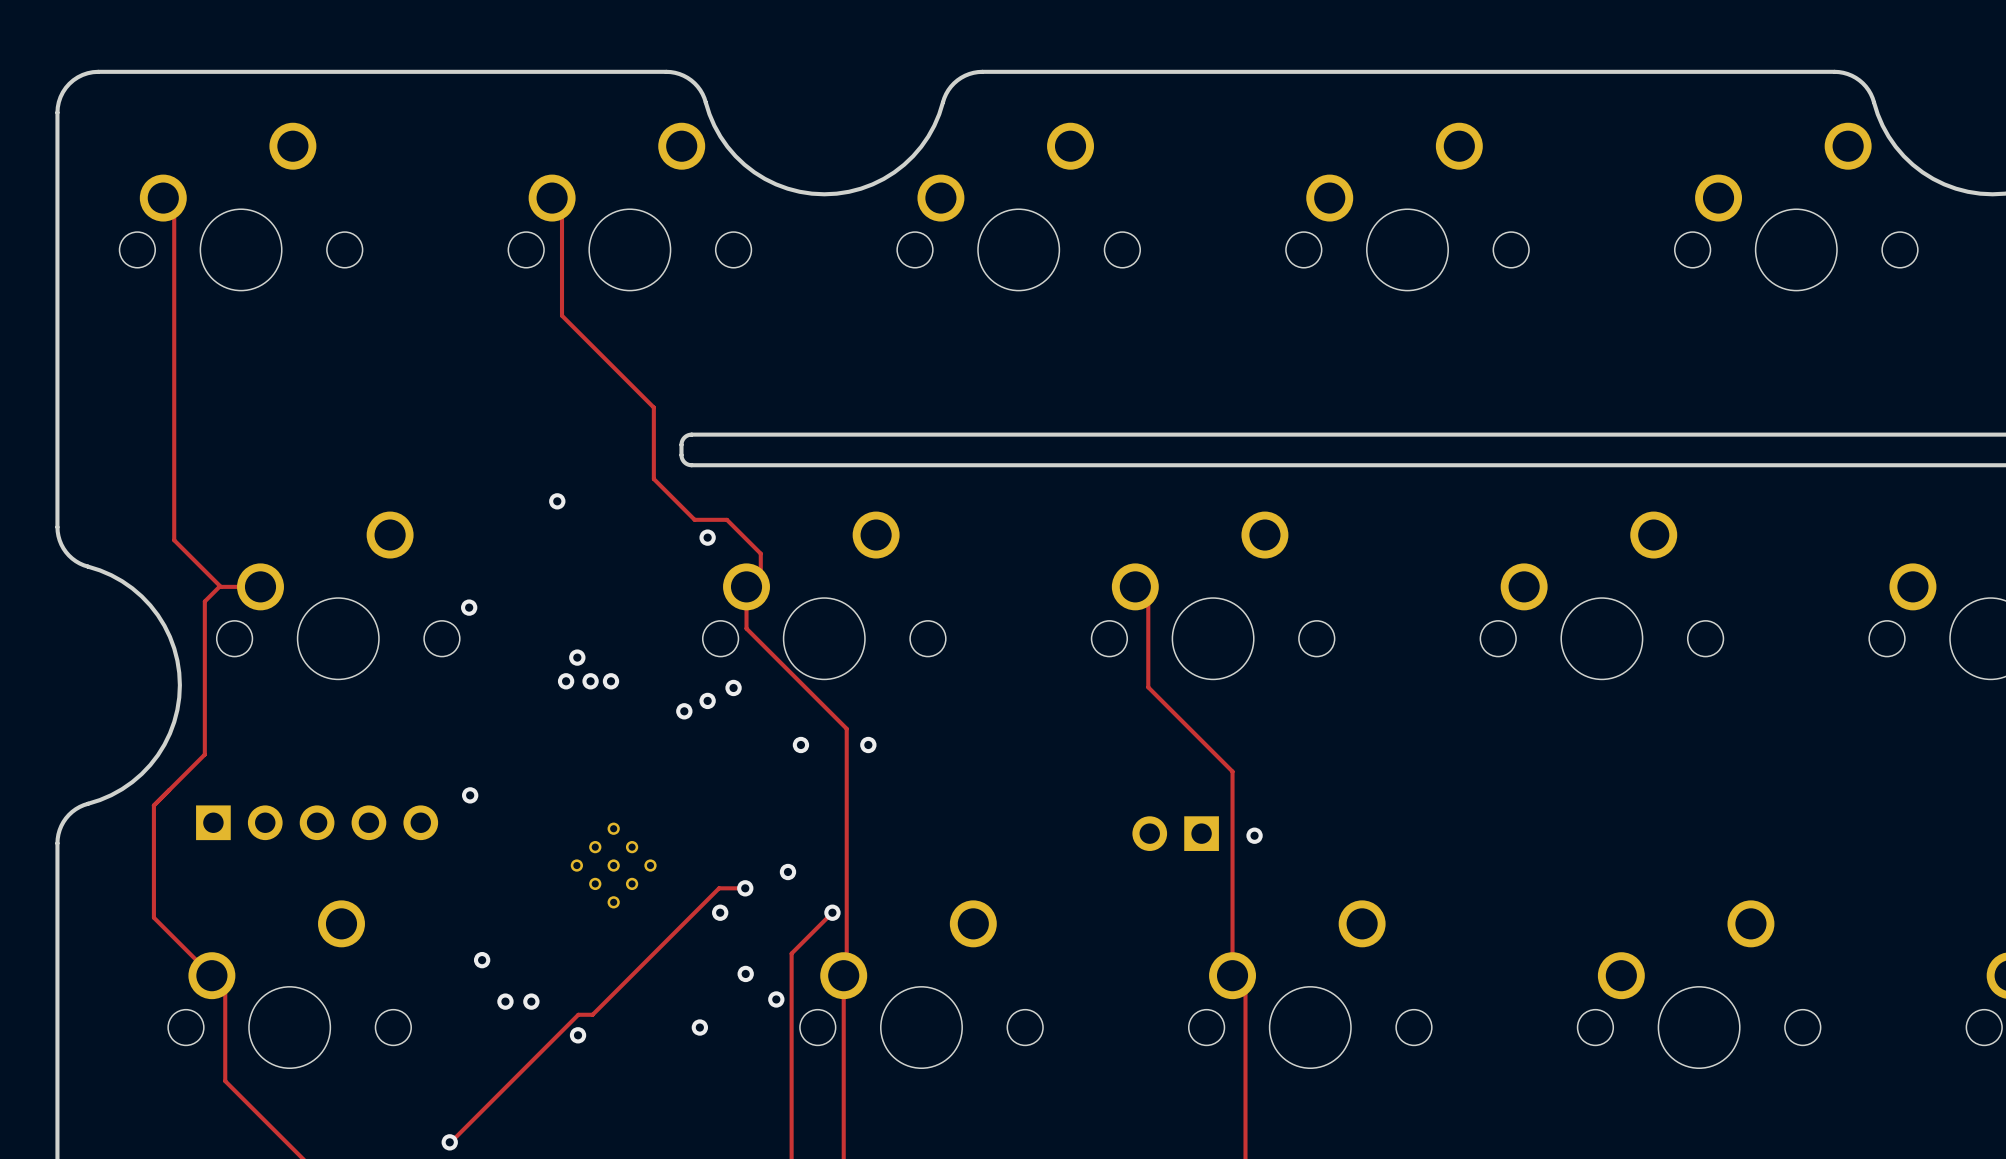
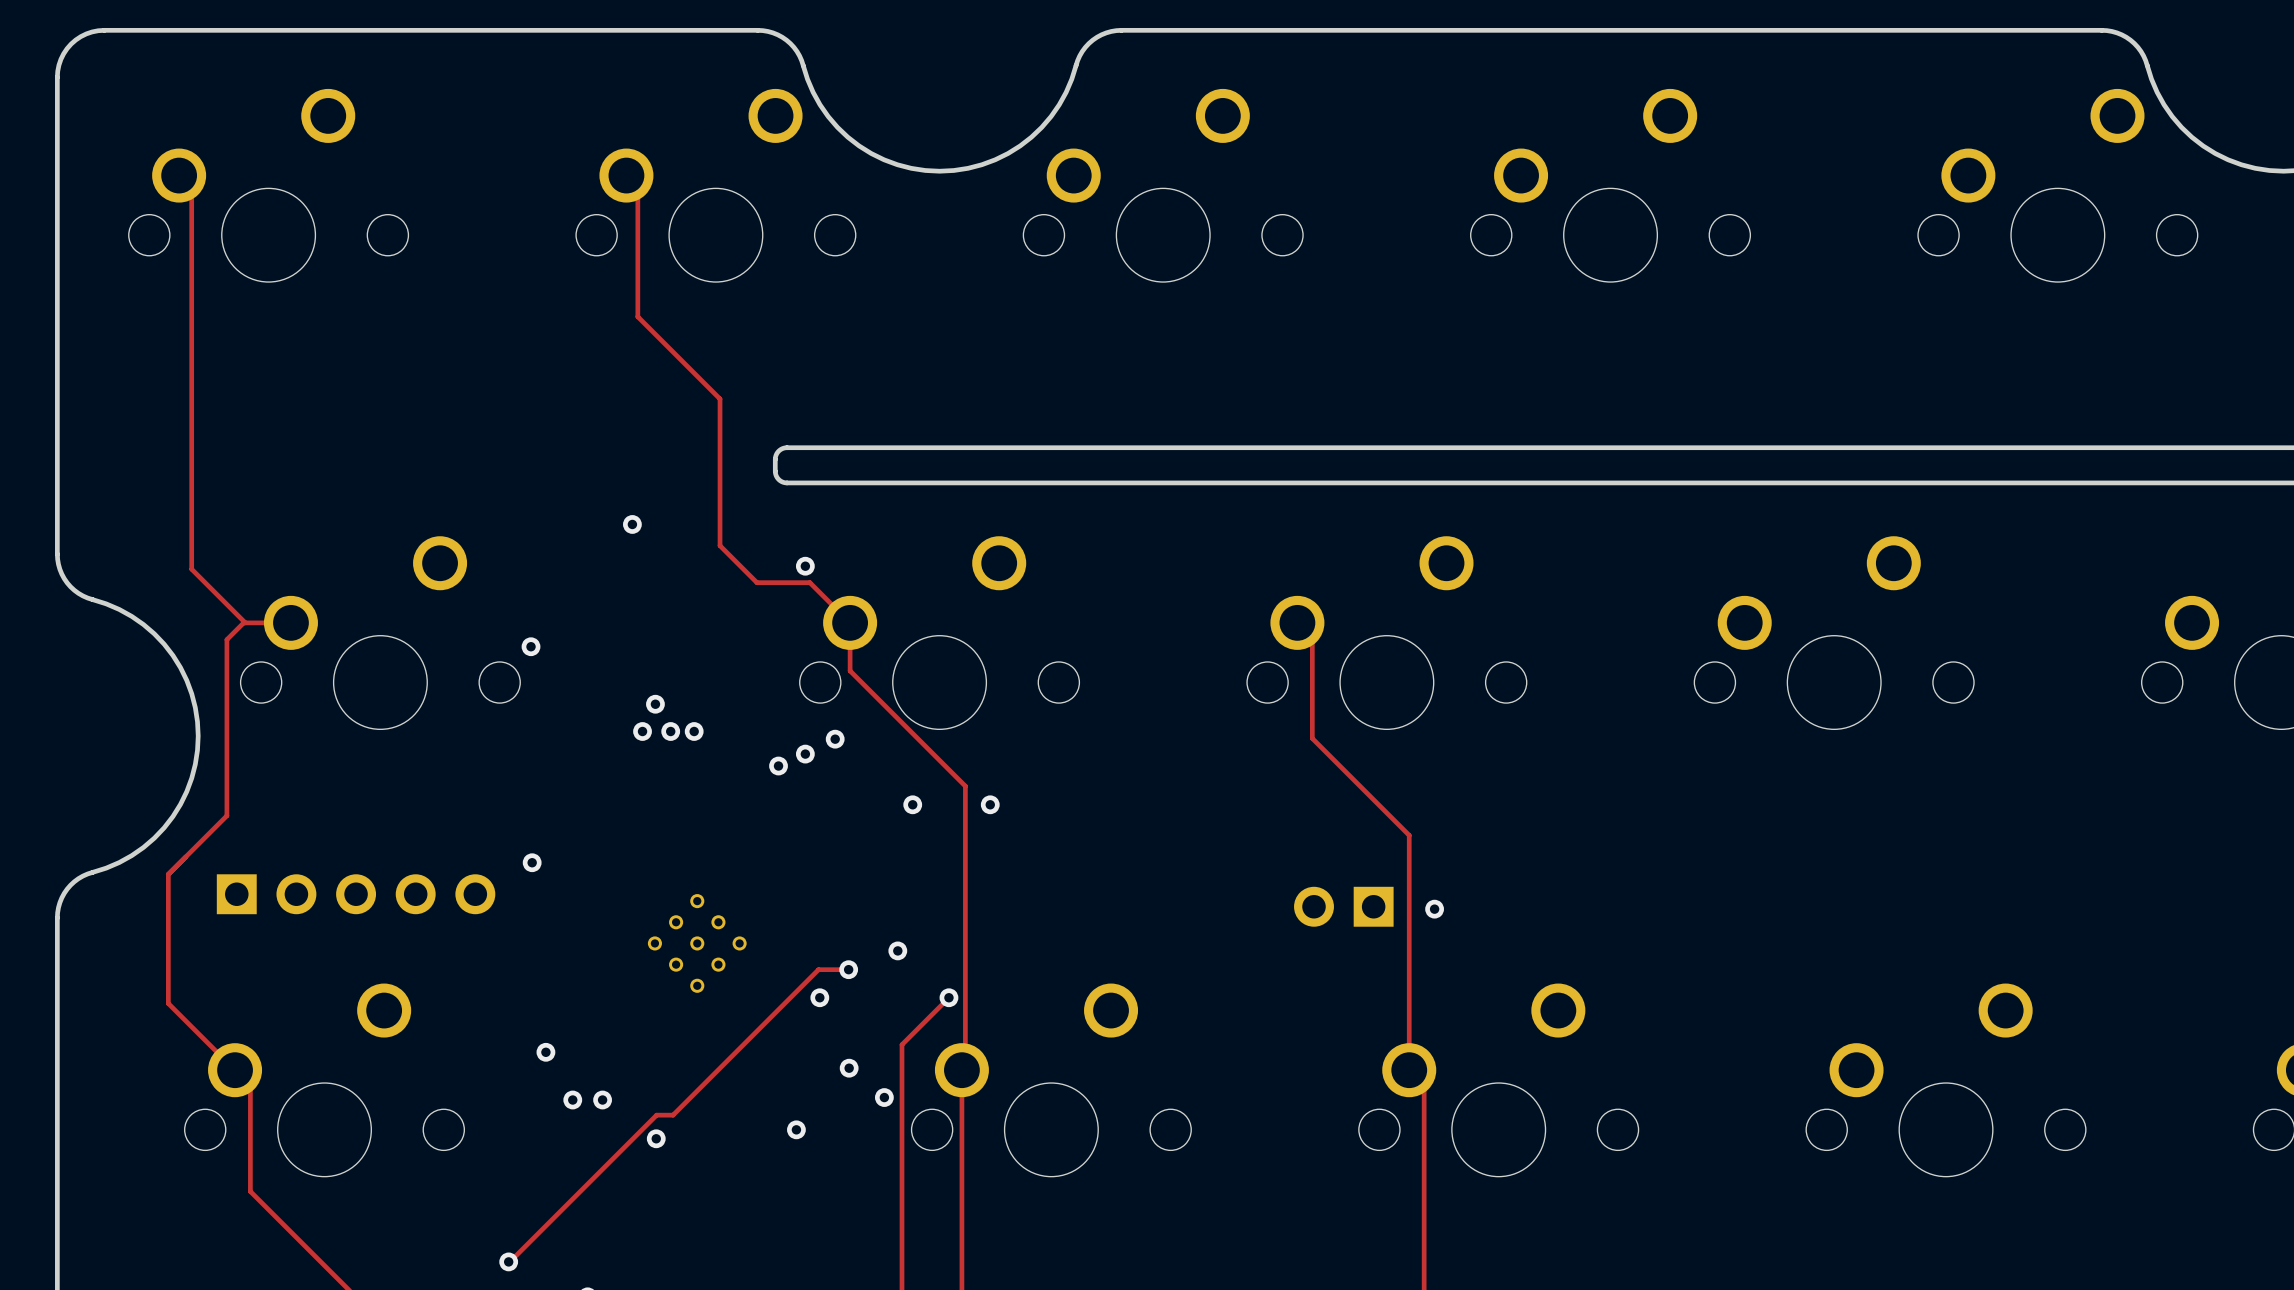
track: (562, 315) (653, 407) (653, 479) (694, 519) (726, 519) (760, 553) (760, 586) -> (637, 310) (637, 316) (720, 398) (720, 545) (756, 582) (809, 582) (850, 622)

